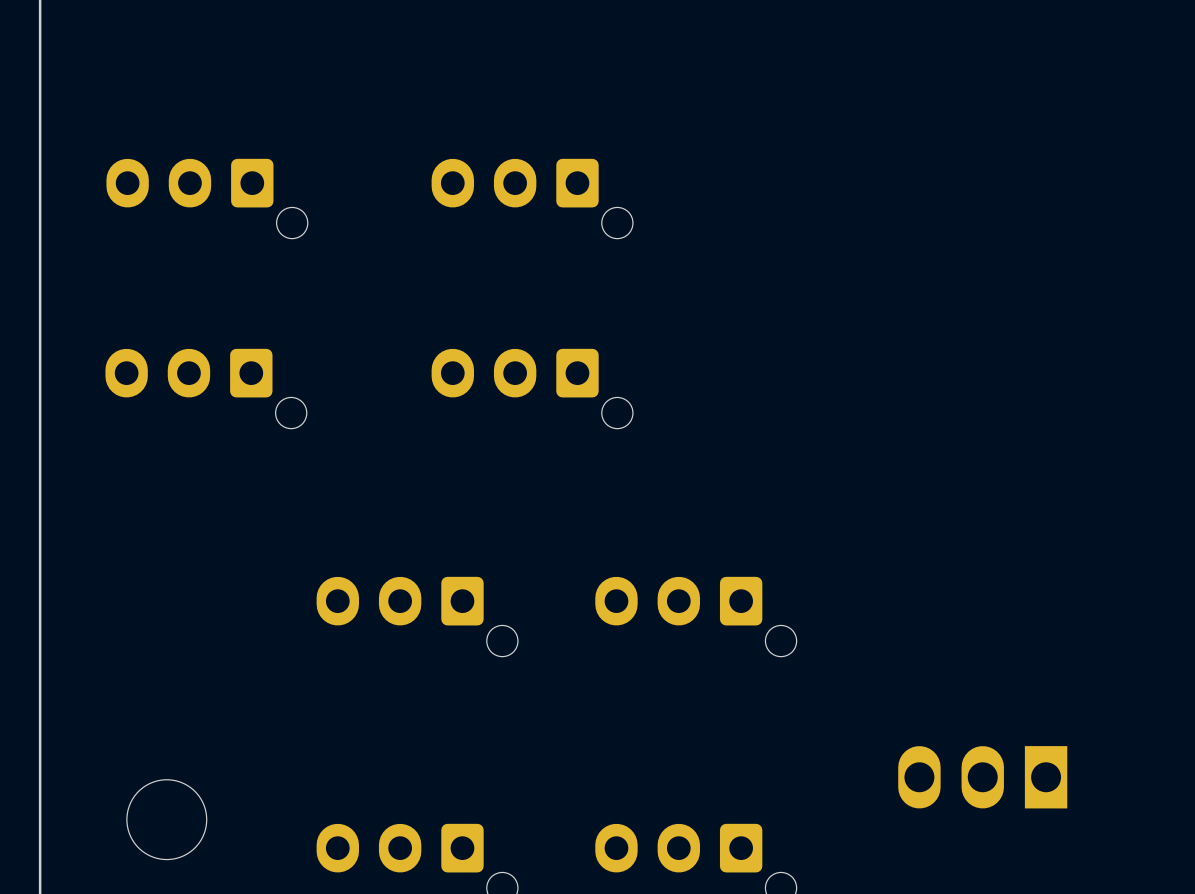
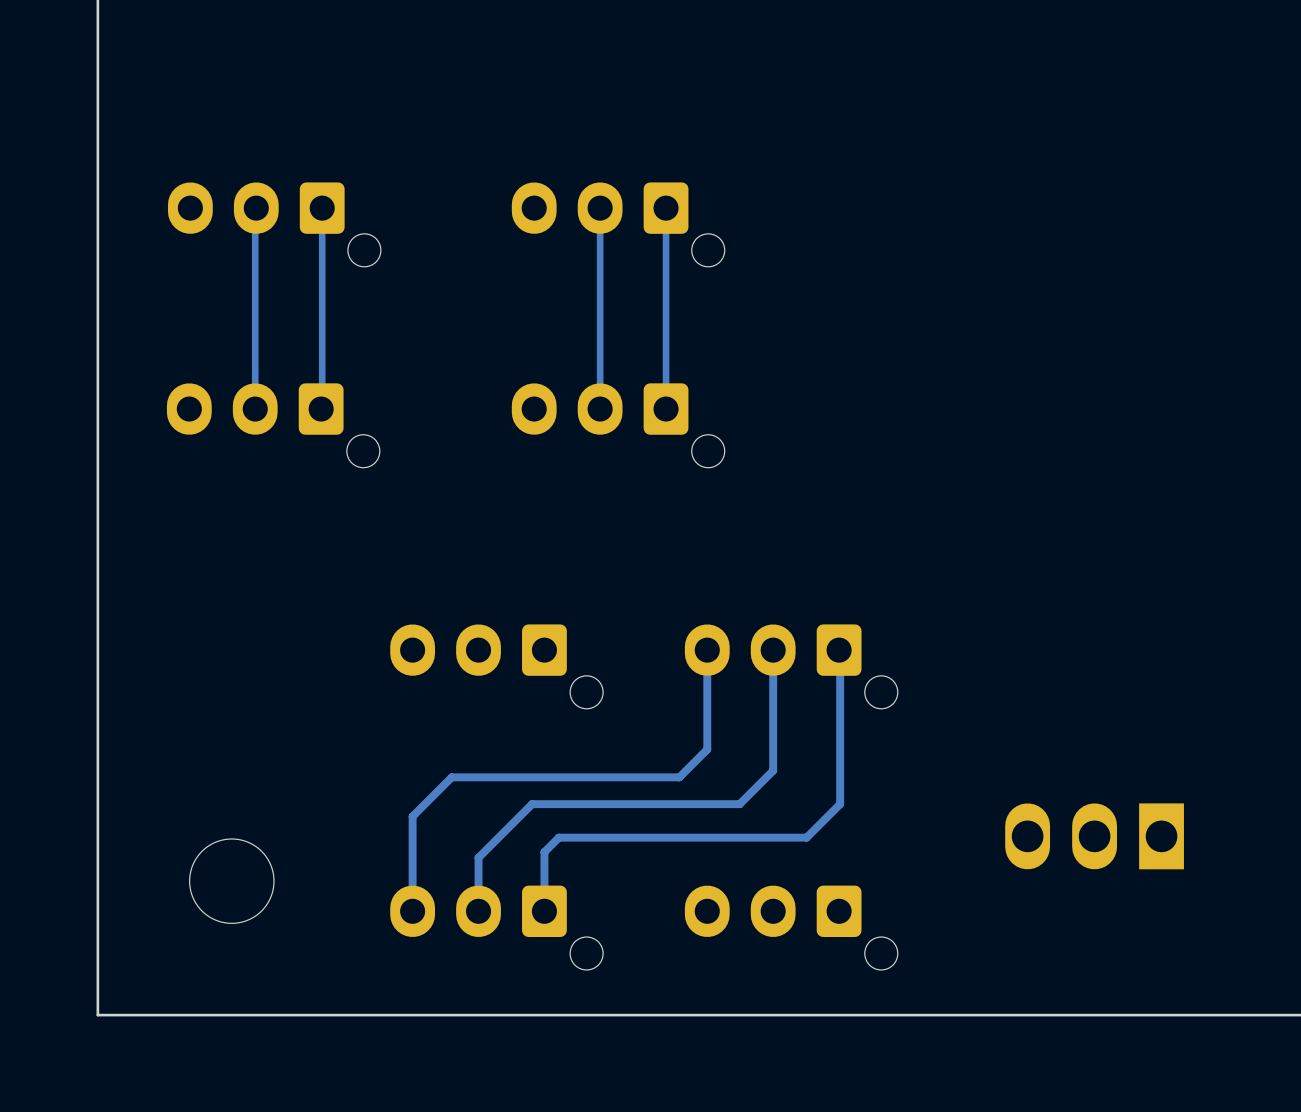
track: none -> (256, 208) (255, 409)
track: none -> (322, 208) (321, 409)
track: none -> (600, 208) (600, 409)
track: none -> (666, 208) (666, 409)
track: none -> (707, 650) (707, 749) (679, 777) (451, 777) (412, 816) (412, 911)
track: none -> (773, 650) (773, 770) (739, 804) (532, 804) (478, 857) (478, 911)
track: none -> (839, 650) (840, 804) (806, 837) (558, 837) (544, 852) (544, 911)

